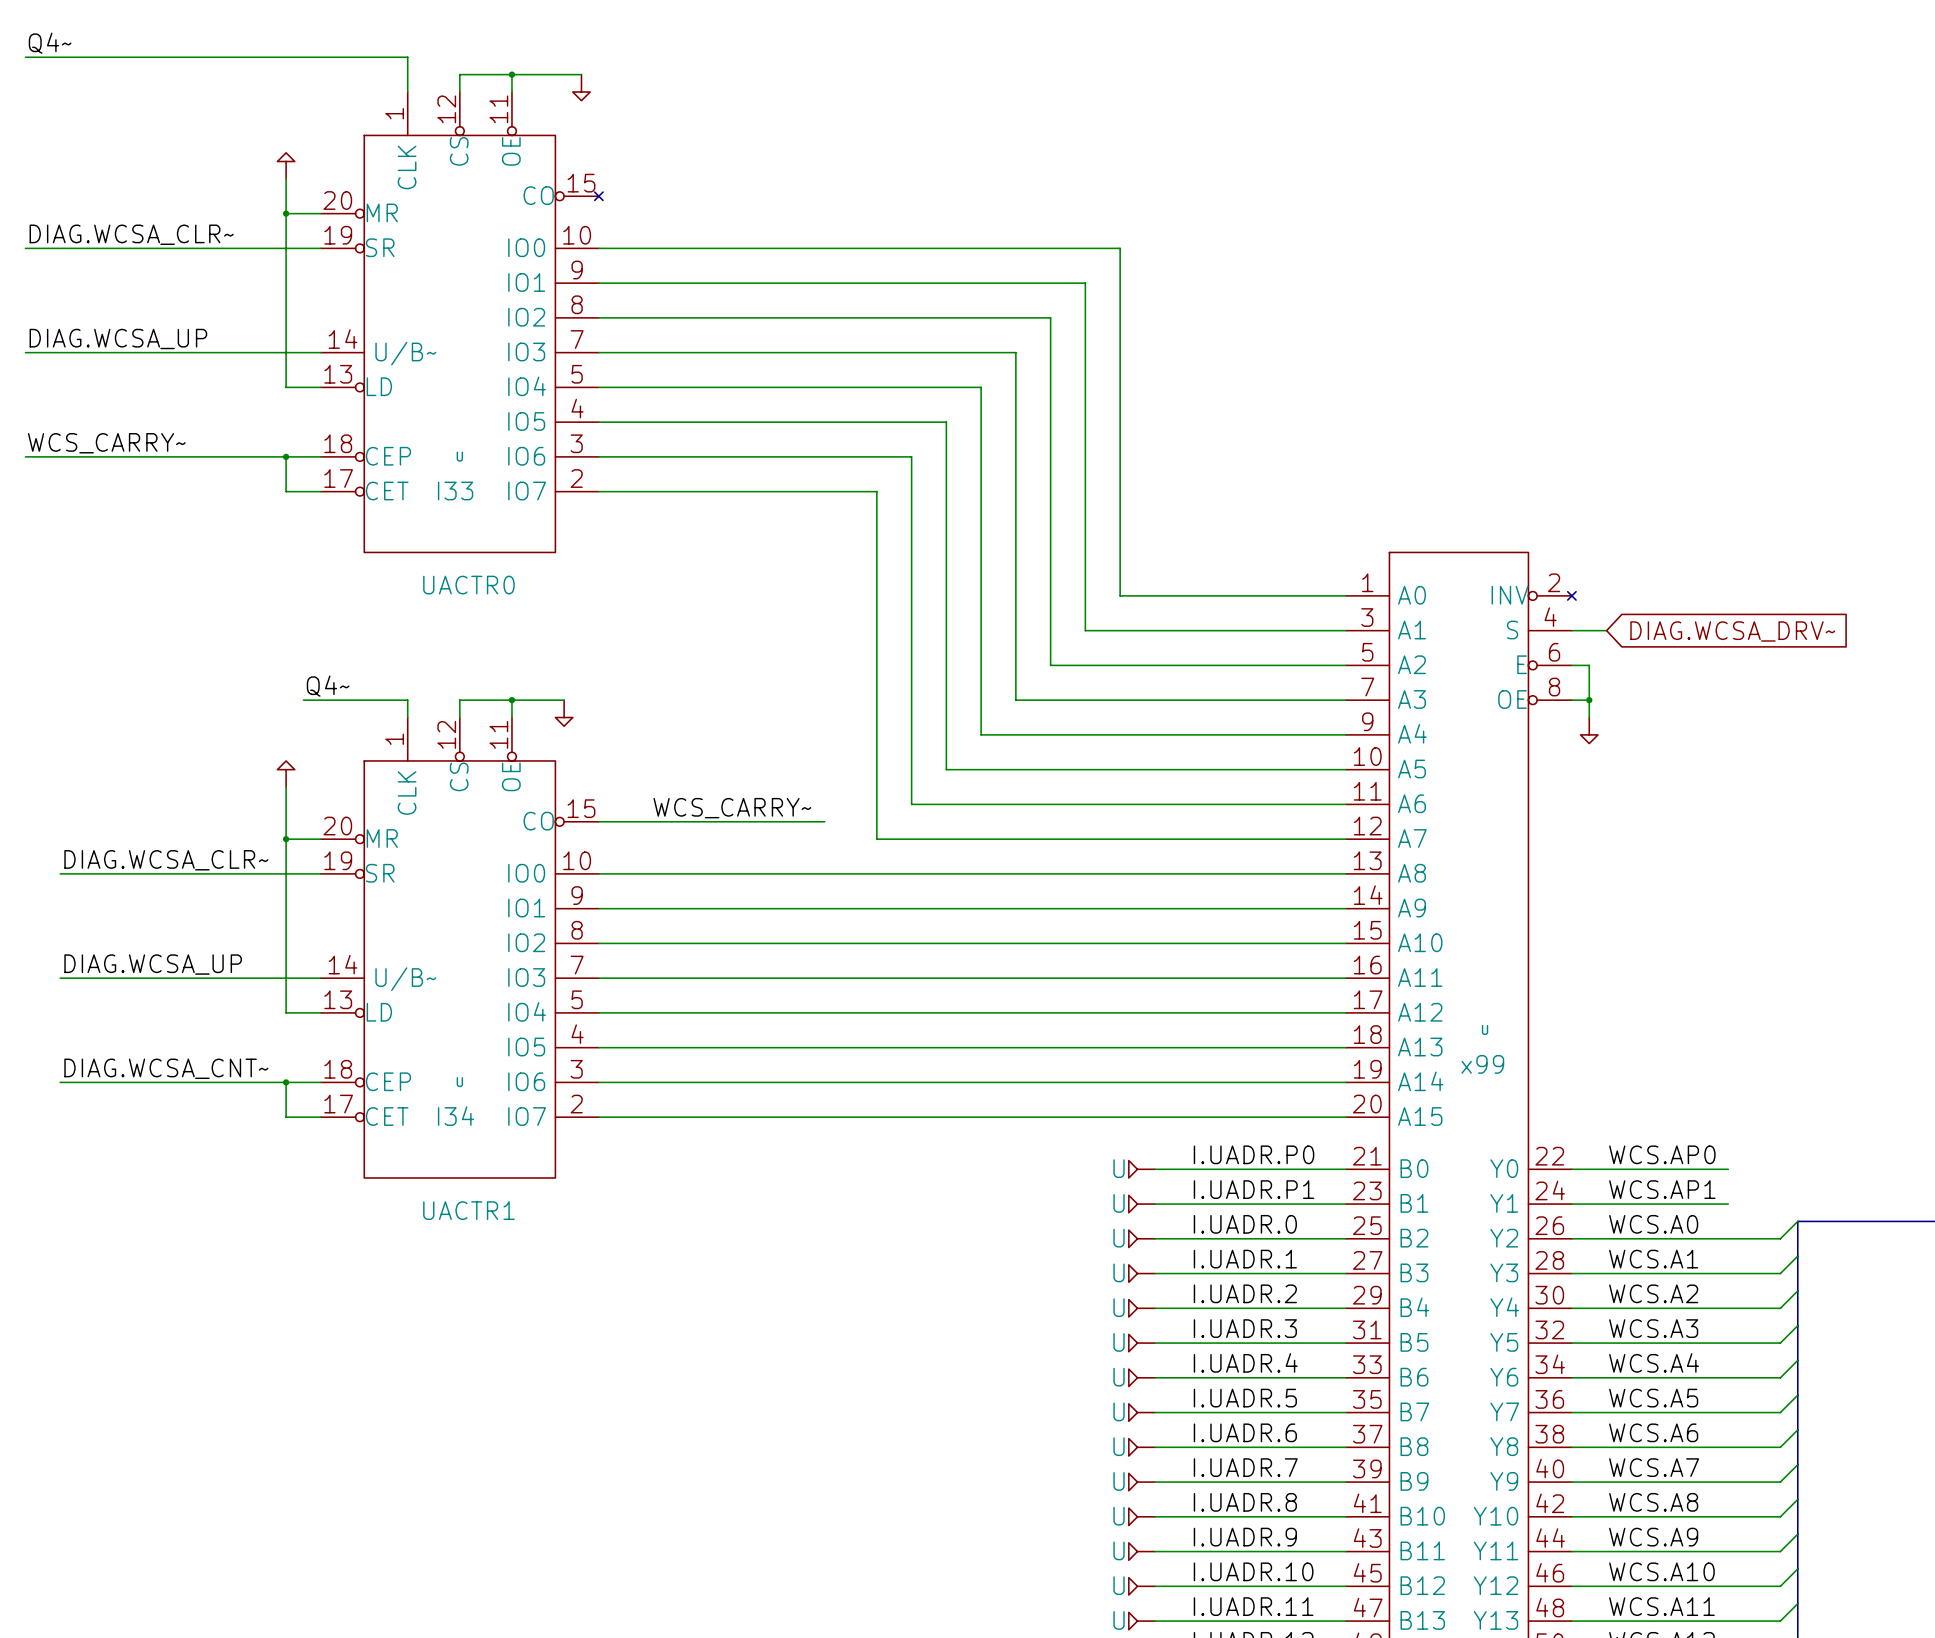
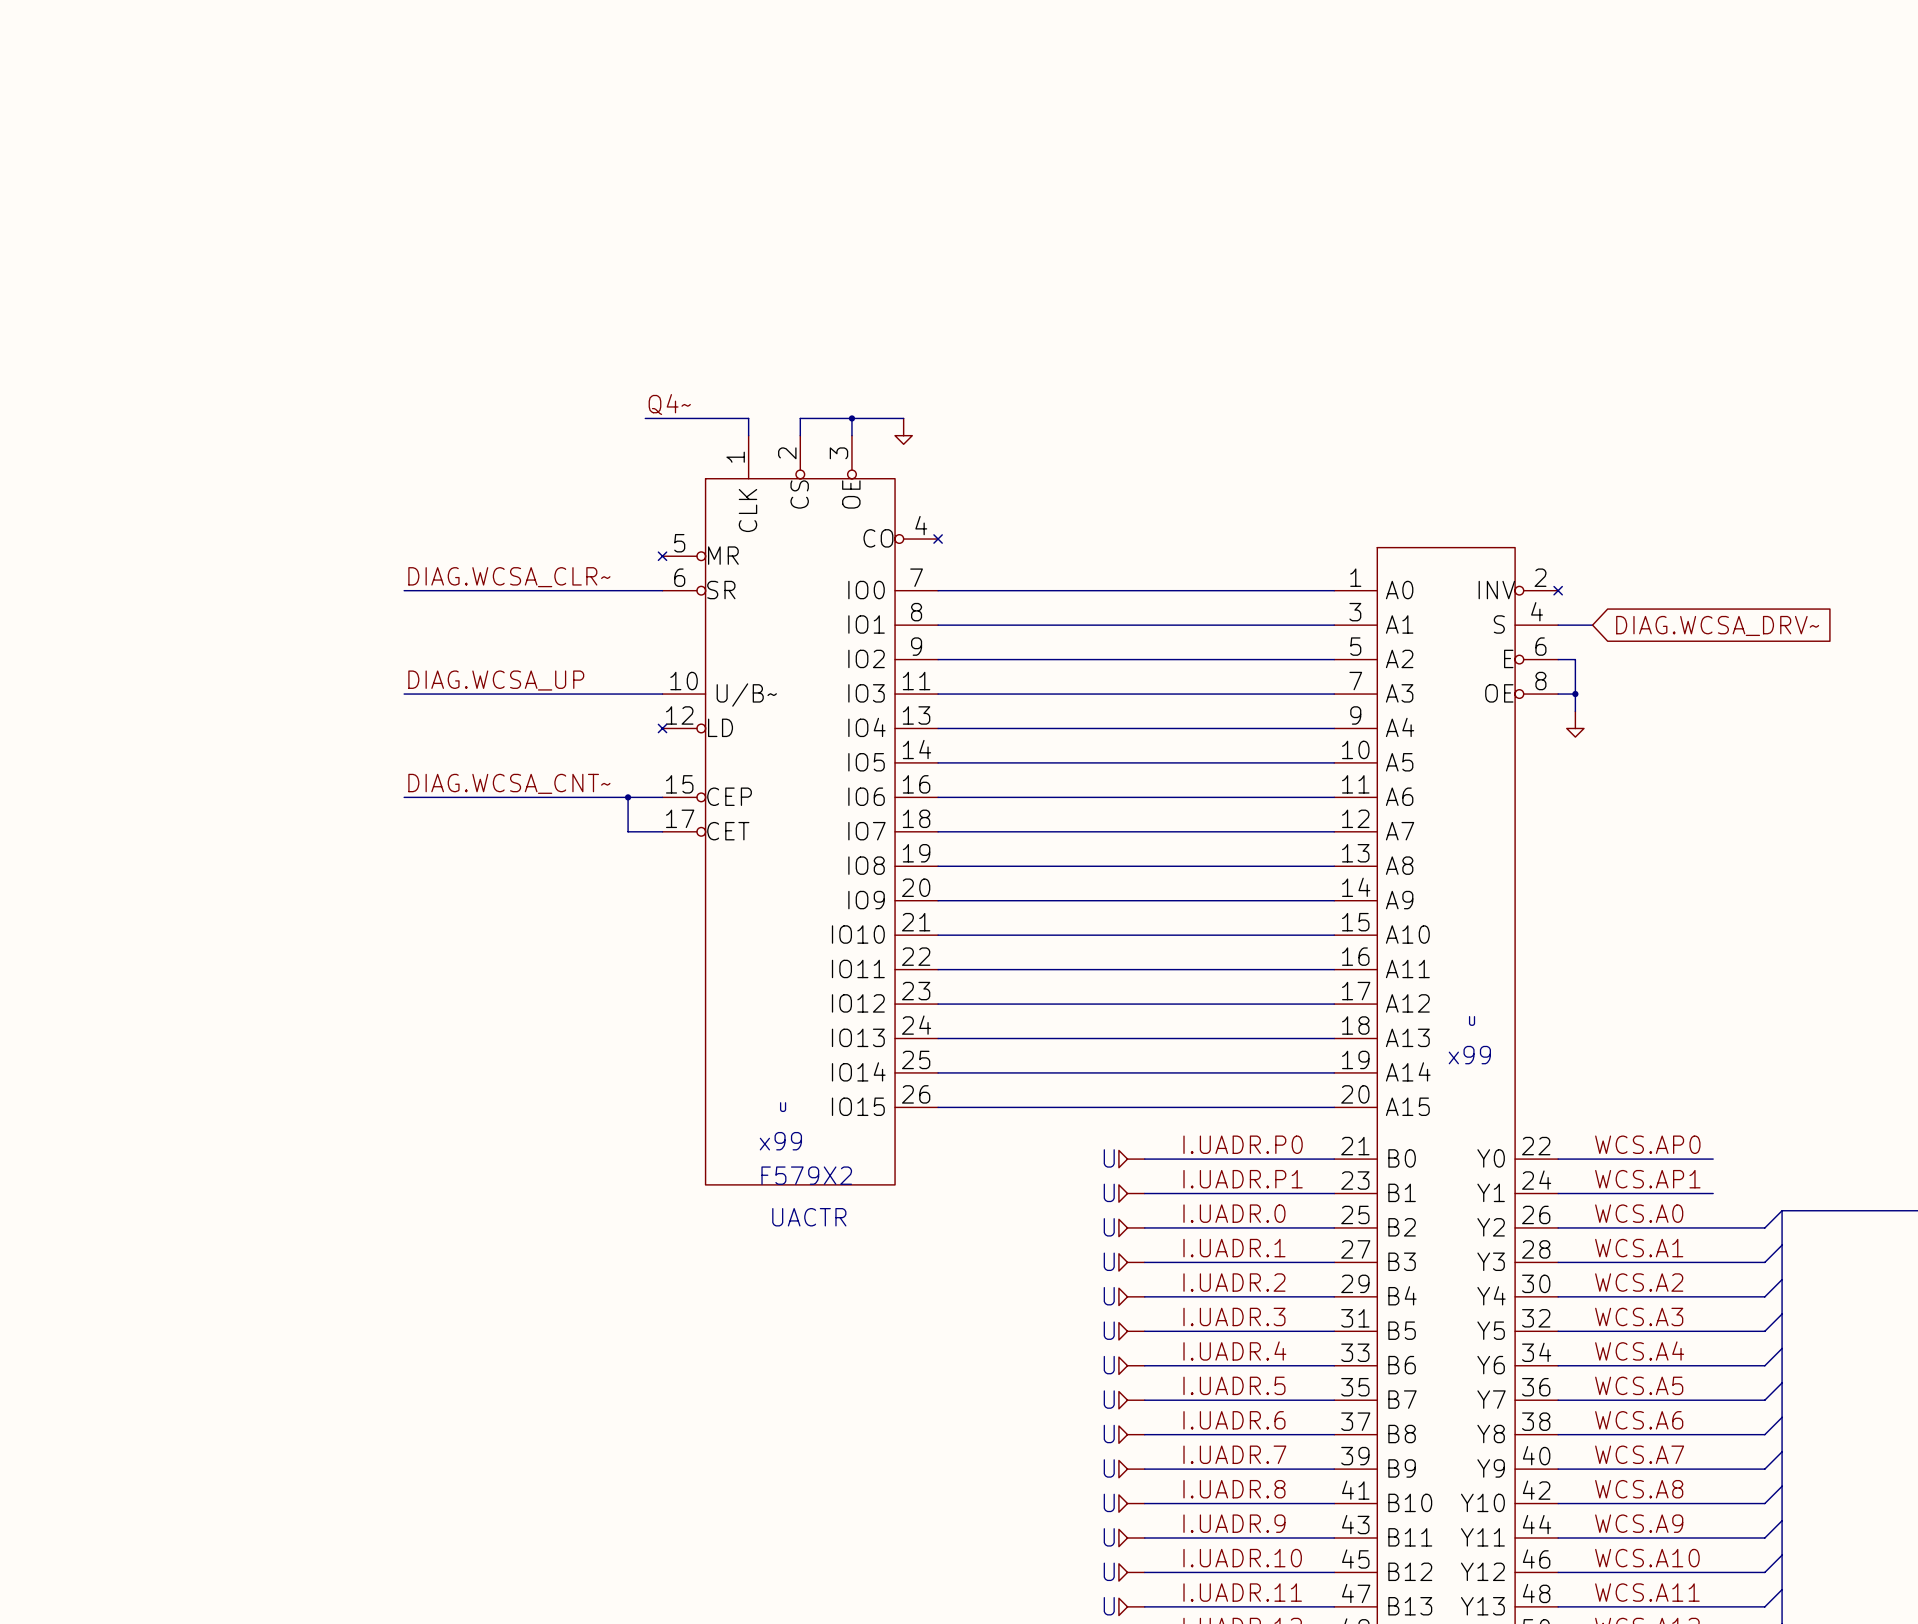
label: Q4~ (50, 43) -> none
wire: (25, 57) (407, 57) (407, 92) -> none
wire: (511, 74) (511, 92) -> none
junction: (511, 74) -> none
wire: (581, 74) (459, 74) (459, 92) -> none
power symbol: (581, 87) -> none
power symbol: (286, 165) -> none
wire: (286, 178) (286, 387) (320, 387) -> none
no-connect mark: (598, 196) -> none
wire: (286, 213) (320, 213) -> none
junction: (286, 213) -> none
label: DIAG.WCSA_CLR~ (131, 234) -> none
wire: (25, 248) (320, 248) -> none
wire: (598, 248) (1120, 248) (1120, 595) -> (938, 590) (1110, 590)
wire: (598, 283) (1085, 283) (1085, 630) -> (938, 625) (1075, 625)
wire: (598, 317) (1050, 317) (1050, 665) -> (938, 659) (1041, 659)
U: (459, 322) -> none
label: DIAG.WCSA_UP (118, 339) -> none
wire: (25, 352) (320, 352) -> none
wire: (598, 352) (1015, 352) (1015, 700) -> (938, 694) (1006, 694)
wire: (598, 387) (981, 387) (981, 734) -> (938, 728) (972, 728)
label: none -> Q4~ (669, 404)
wire: (598, 422) (650, 422) -> none
wire: (755, 422) (807, 422) -> (748, 418) (748, 435)
wire: none -> (800, 418) (800, 435)
wire: none -> (851, 418) (851, 435)
junction: none -> (851, 418)
wire: (911, 422) (946, 422) (946, 769) -> none
power symbol: none -> (903, 431)
label: WCS_CARRY~ (106, 443) -> none
wire: (25, 456) (320, 456) -> none
wire: (286, 456) (286, 491) (320, 491) -> none
junction: (286, 456) -> none
wire: (598, 456) (911, 456) (911, 804) (946, 804) -> none
wire: (598, 491) (876, 491) (876, 839) (946, 839) -> none
no-connect mark: none -> (938, 539)
no-connect mark: none -> (662, 556)
label: none -> DIAG.WCSA_CLR~ (509, 577)
wire: none -> (404, 590) (662, 590)
label: Q4~ (328, 686) -> none
label: none -> DIAG.WCSA_UP (496, 680)
wire: (303, 700) (407, 700) (407, 717) -> none
wire: (459, 700) (459, 717) -> (455, 694) (404, 694)
wire: (511, 700) (511, 717) -> none
junction: (511, 700) -> none
wire: none -> (559, 694) (662, 694)
power symbol: (564, 713) -> none
no-connect mark: none -> (662, 728)
power symbol: (286, 773) -> none
wire: (286, 787) (286, 1012) (320, 1012) -> none
label: none -> DIAG.WCSA_CNT~ (509, 783)
wire: none -> (404, 797) (662, 797)
wire: none -> (628, 797) (628, 831) (662, 831)
junction: none -> (628, 797)
label: WCS_CARRY~ (732, 808) -> none
U: none -> F579X2 (800, 810)
wire: (598, 821) (824, 821) -> none
wire: (286, 839) (320, 839) -> none
junction: (286, 839) -> none
label: DIAG.WCSA_CLR~ (166, 860) -> none
wire: (60, 873) (320, 873) -> none
wire: (598, 873) (946, 873) -> none
wire: (598, 908) (946, 908) -> none
wire: (598, 943) (946, 943) -> none
U: (459, 947) -> none
label: DIAG.WCSA_UP (153, 964) -> none
wire: (60, 978) (320, 978) -> none
wire: (598, 978) (946, 978) -> none
wire: (598, 1012) (946, 1012) -> none
wire: (598, 1047) (946, 1047) -> none
label: DIAG.WCSA_CNT~ (166, 1068) -> none
wire: (60, 1082) (320, 1082) -> none
wire: (286, 1082) (286, 1117) (320, 1117) -> none
junction: (286, 1082) -> none
wire: (598, 1082) (946, 1082) -> none
wire: (598, 1117) (946, 1117) -> none

